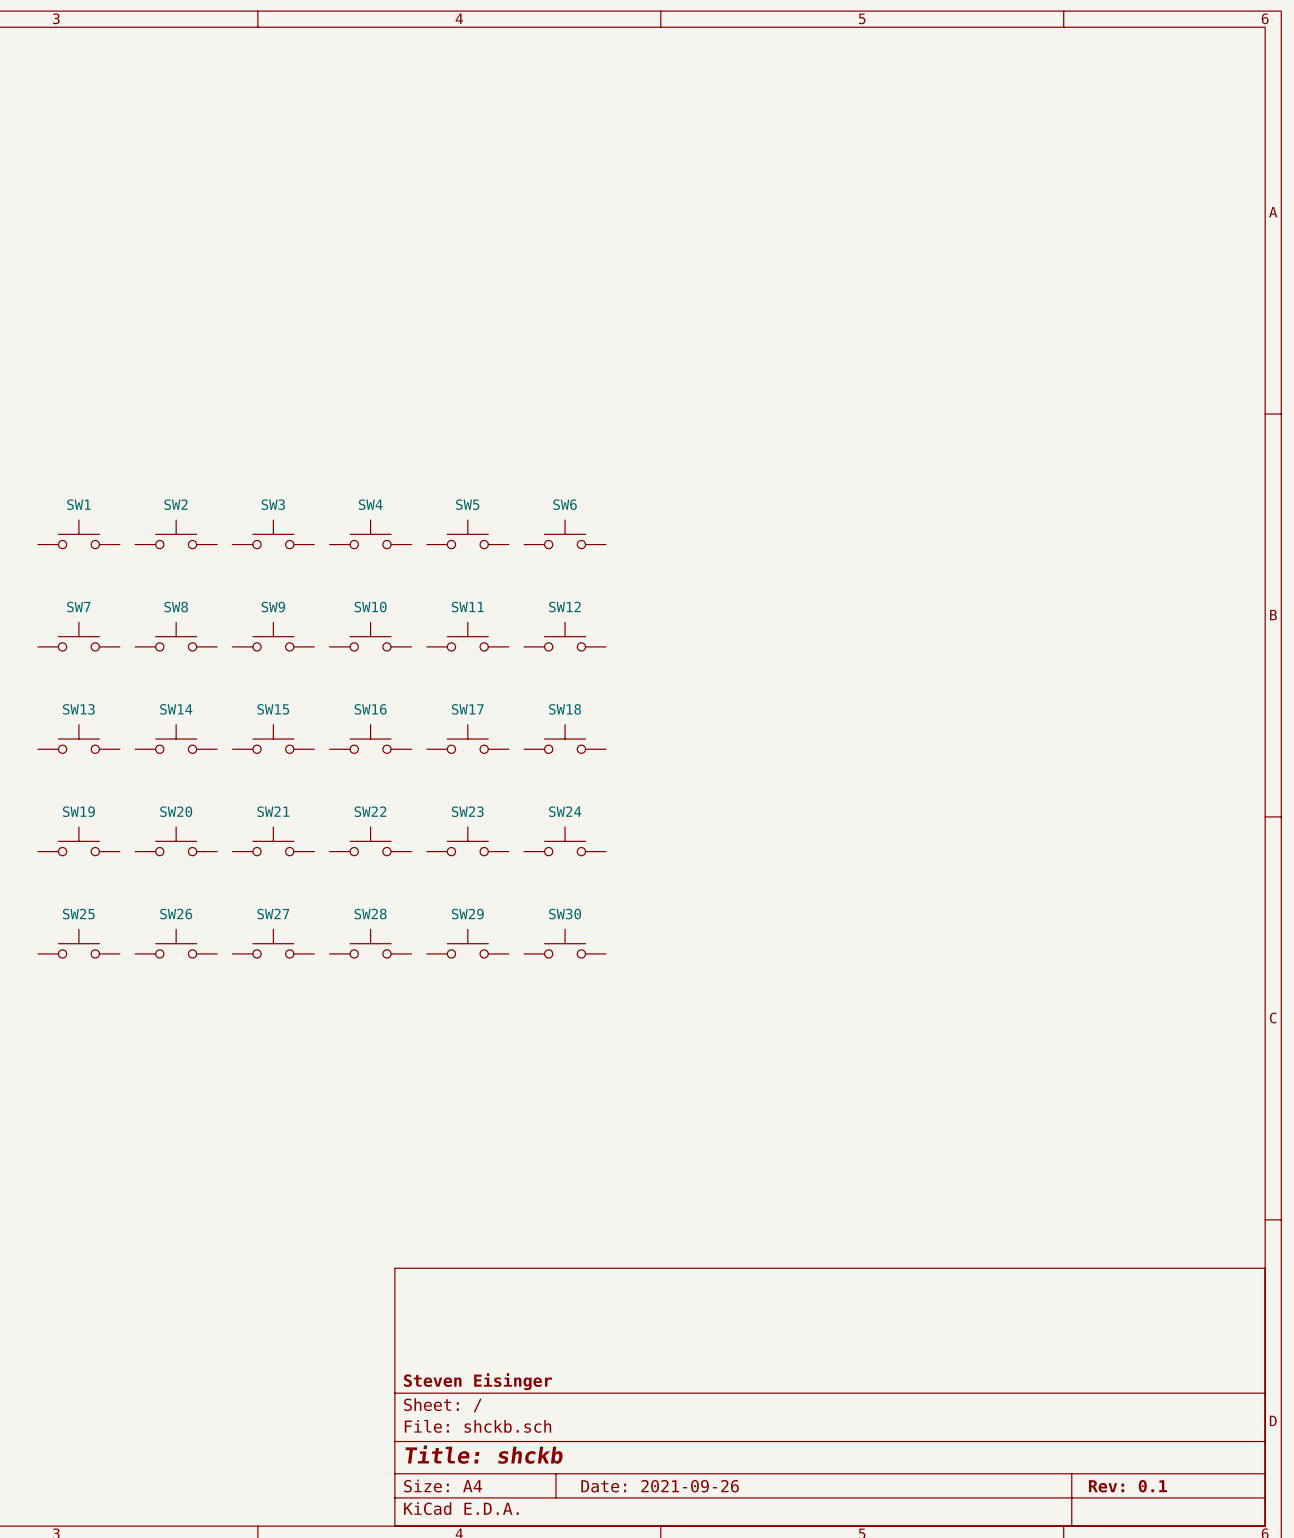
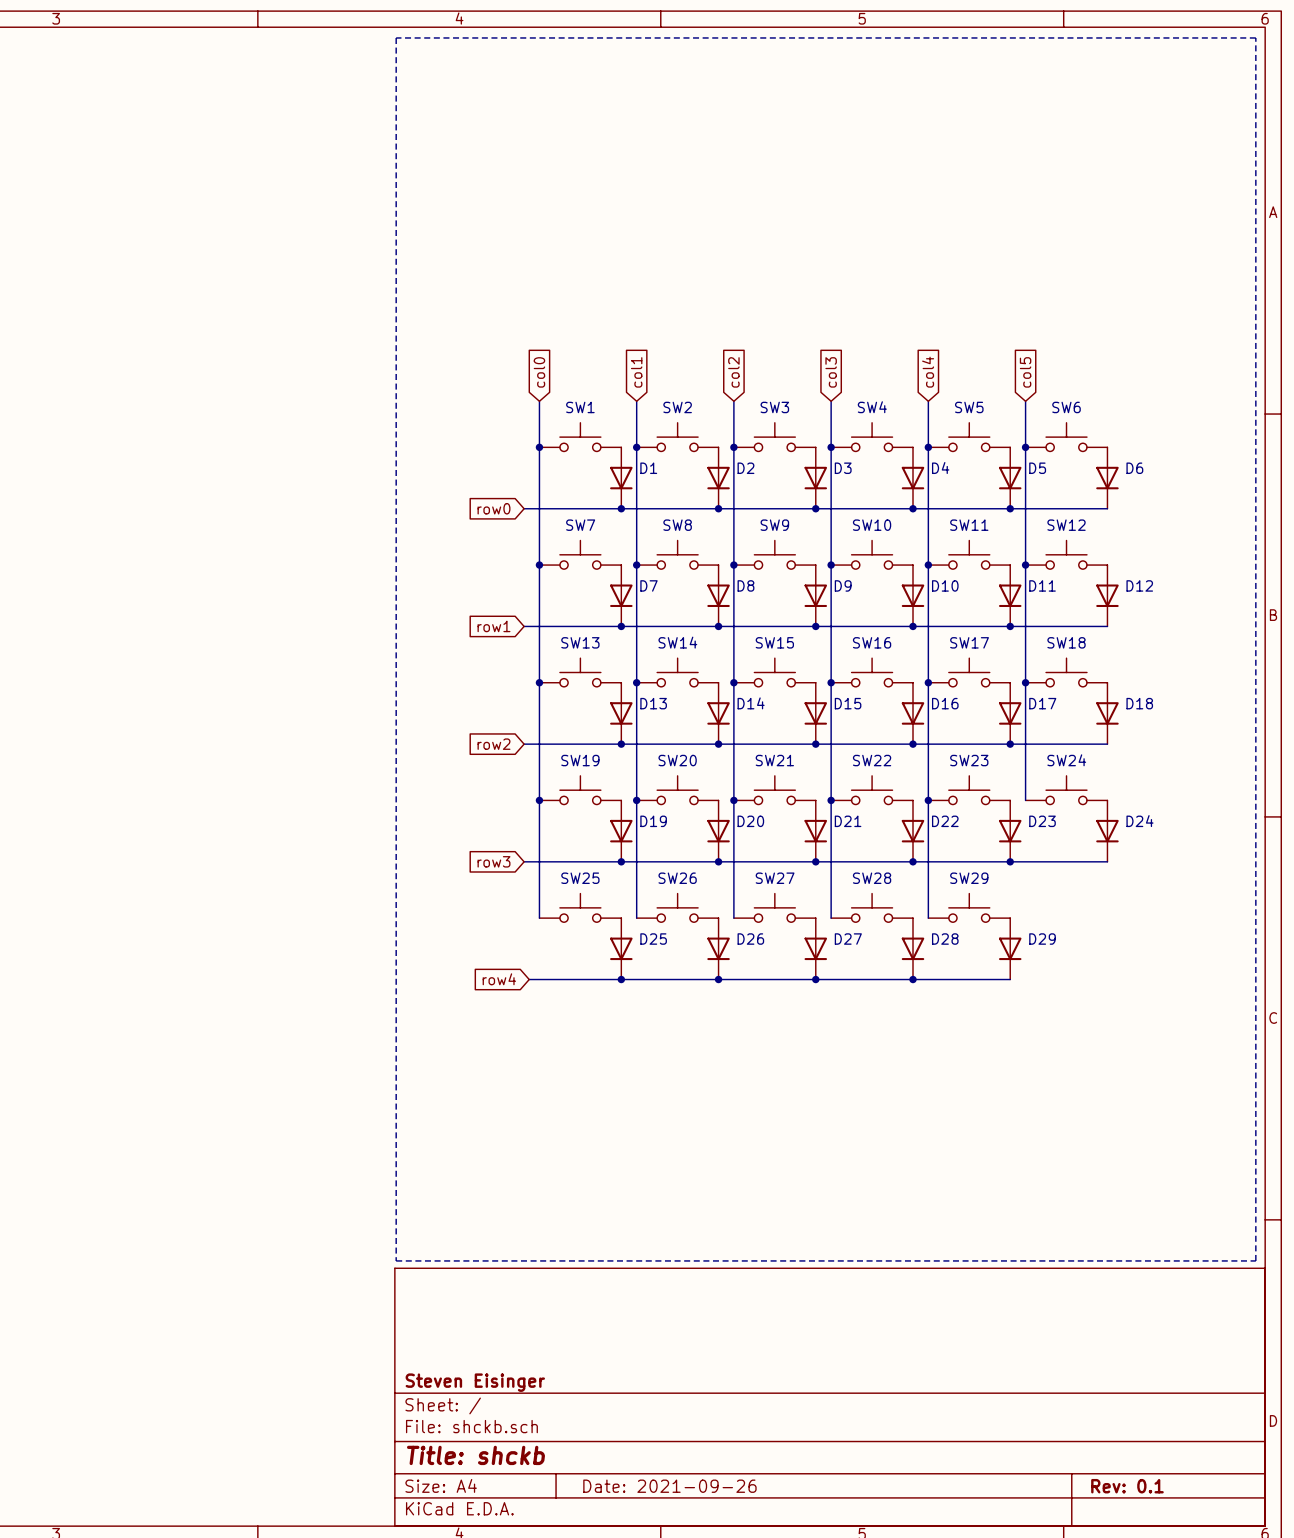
line: none -> (396, 37) (1255, 37) (1255, 1260) (396, 1260) (396, 37)
global label: none -> col0 (539, 372)
global label: none -> col1 (636, 372)
global label: none -> col2 (733, 372)
global label: none -> col3 (831, 372)
global label: none -> col4 (928, 372)
global label: none -> col5 (1025, 372)
wire: none -> (539, 401) (539, 918)
wire: none -> (636, 401) (636, 918)
wire: none -> (733, 401) (733, 918)
wire: none -> (831, 401) (831, 918)
wire: none -> (928, 401) (928, 918)
wire: none -> (1025, 401) (1025, 800)
junction: none -> (539, 447)
junction: none -> (636, 447)
junction: none -> (733, 447)
junction: none -> (831, 447)
junction: none -> (928, 447)
junction: none -> (1025, 447)
D1: none -> (621, 478)
D2: none -> (718, 478)
D3: none -> (815, 478)
D4: none -> (913, 478)
D5: none -> (1010, 478)
D6: none -> (1107, 478)
global label: none -> row0 (493, 508)
wire: none -> (524, 508) (1107, 508)
junction: none -> (621, 508)
junction: none -> (718, 508)
junction: none -> (815, 508)
junction: none -> (913, 508)
junction: none -> (1010, 508)
SW1 position: (78, 534) -> (580, 437)
SW2 position: (176, 534) -> (677, 437)
SW3 position: (273, 534) -> (774, 437)
SW4 position: (370, 534) -> (872, 437)
SW5 position: (467, 534) -> (969, 437)
SW6 position: (565, 534) -> (1066, 437)
junction: none -> (539, 565)
junction: none -> (636, 565)
junction: none -> (733, 565)
junction: none -> (831, 565)
junction: none -> (928, 565)
junction: none -> (1025, 565)
D7: none -> (621, 595)
D8: none -> (718, 595)
D9: none -> (815, 595)
D10: none -> (913, 595)
D11: none -> (1010, 595)
D12: none -> (1107, 595)
global label: none -> row1 (493, 626)
wire: none -> (524, 626) (1107, 626)
junction: none -> (621, 626)
junction: none -> (718, 626)
junction: none -> (815, 626)
junction: none -> (913, 626)
junction: none -> (1010, 626)
SW7 position: (78, 636) -> (580, 554)
SW8 position: (176, 636) -> (677, 554)
SW9 position: (273, 636) -> (774, 554)
SW10 position: (370, 636) -> (872, 554)
SW11 position: (467, 636) -> (969, 554)
SW12 position: (565, 636) -> (1066, 554)
junction: none -> (539, 682)
junction: none -> (636, 682)
junction: none -> (733, 682)
junction: none -> (831, 682)
junction: none -> (928, 682)
junction: none -> (1025, 682)
D13: none -> (621, 713)
D14: none -> (718, 713)
D15: none -> (815, 713)
D16: none -> (913, 713)
D17: none -> (1010, 713)
D18: none -> (1107, 713)
SW13 position: (78, 739) -> (580, 672)
SW14 position: (176, 739) -> (677, 672)
SW15 position: (273, 739) -> (774, 672)
SW16 position: (370, 739) -> (872, 672)
SW17 position: (467, 739) -> (969, 672)
SW18 position: (565, 739) -> (1066, 672)
global label: none -> row2 (493, 744)
wire: none -> (524, 744) (1107, 744)
junction: none -> (621, 744)
junction: none -> (718, 744)
junction: none -> (815, 744)
junction: none -> (913, 744)
junction: none -> (1010, 744)
junction: none -> (539, 800)
junction: none -> (636, 800)
junction: none -> (733, 800)
junction: none -> (831, 800)
junction: none -> (928, 800)
D19: none -> (621, 831)
D20: none -> (718, 831)
D21: none -> (815, 831)
D22: none -> (913, 831)
D23: none -> (1010, 831)
D24: none -> (1107, 831)
SW19 position: (78, 841) -> (580, 790)
SW20 position: (176, 841) -> (677, 790)
SW21 position: (273, 841) -> (774, 790)
SW22 position: (370, 841) -> (872, 790)
SW23 position: (467, 841) -> (969, 790)
SW24 position: (565, 841) -> (1066, 790)
global label: none -> row3 (493, 861)
wire: none -> (524, 861) (1107, 861)
junction: none -> (621, 861)
junction: none -> (718, 861)
junction: none -> (815, 861)
junction: none -> (913, 861)
junction: none -> (1010, 861)
SW25 position: (78, 943) -> (580, 907)
SW26 position: (176, 943) -> (677, 907)
SW27 position: (273, 943) -> (774, 907)
SW28 position: (370, 943) -> (872, 907)
SW29 position: (467, 943) -> (969, 907)
SW30: (565, 943) -> none
D25: none -> (621, 948)
D26: none -> (718, 948)
D27: none -> (815, 948)
D28: none -> (913, 948)
D29: none -> (1010, 948)
global label: none -> row4 (499, 979)
wire: none -> (529, 979) (1010, 979)
junction: none -> (621, 979)
junction: none -> (718, 979)
junction: none -> (815, 979)
junction: none -> (913, 979)

